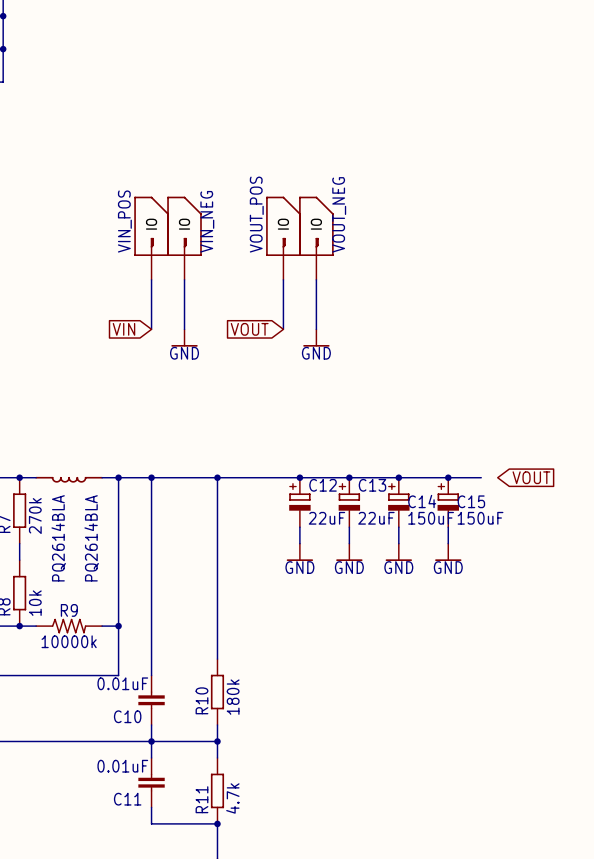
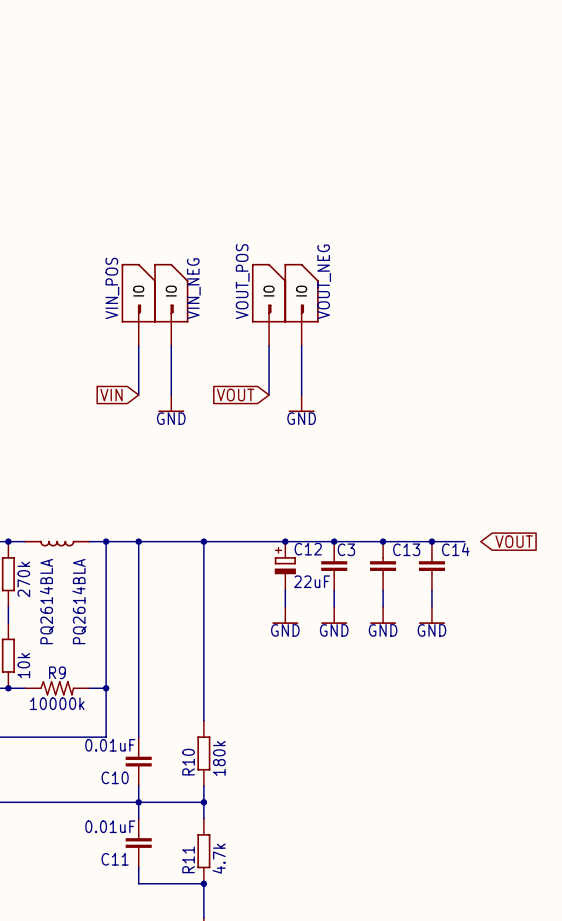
C13 symbol: [338, 477, 361, 528] -> [370, 541, 397, 591]
C14 symbol: [388, 477, 410, 528] -> [418, 541, 445, 591]
C14 name position: C14 (422, 501) -> C14 (455, 549)
C3: none -> (334, 566)
C15: 150uF (448, 502) -> none
C13 value: 22uF (376, 518) -> none
C14 value: 150uF (431, 518) -> none

